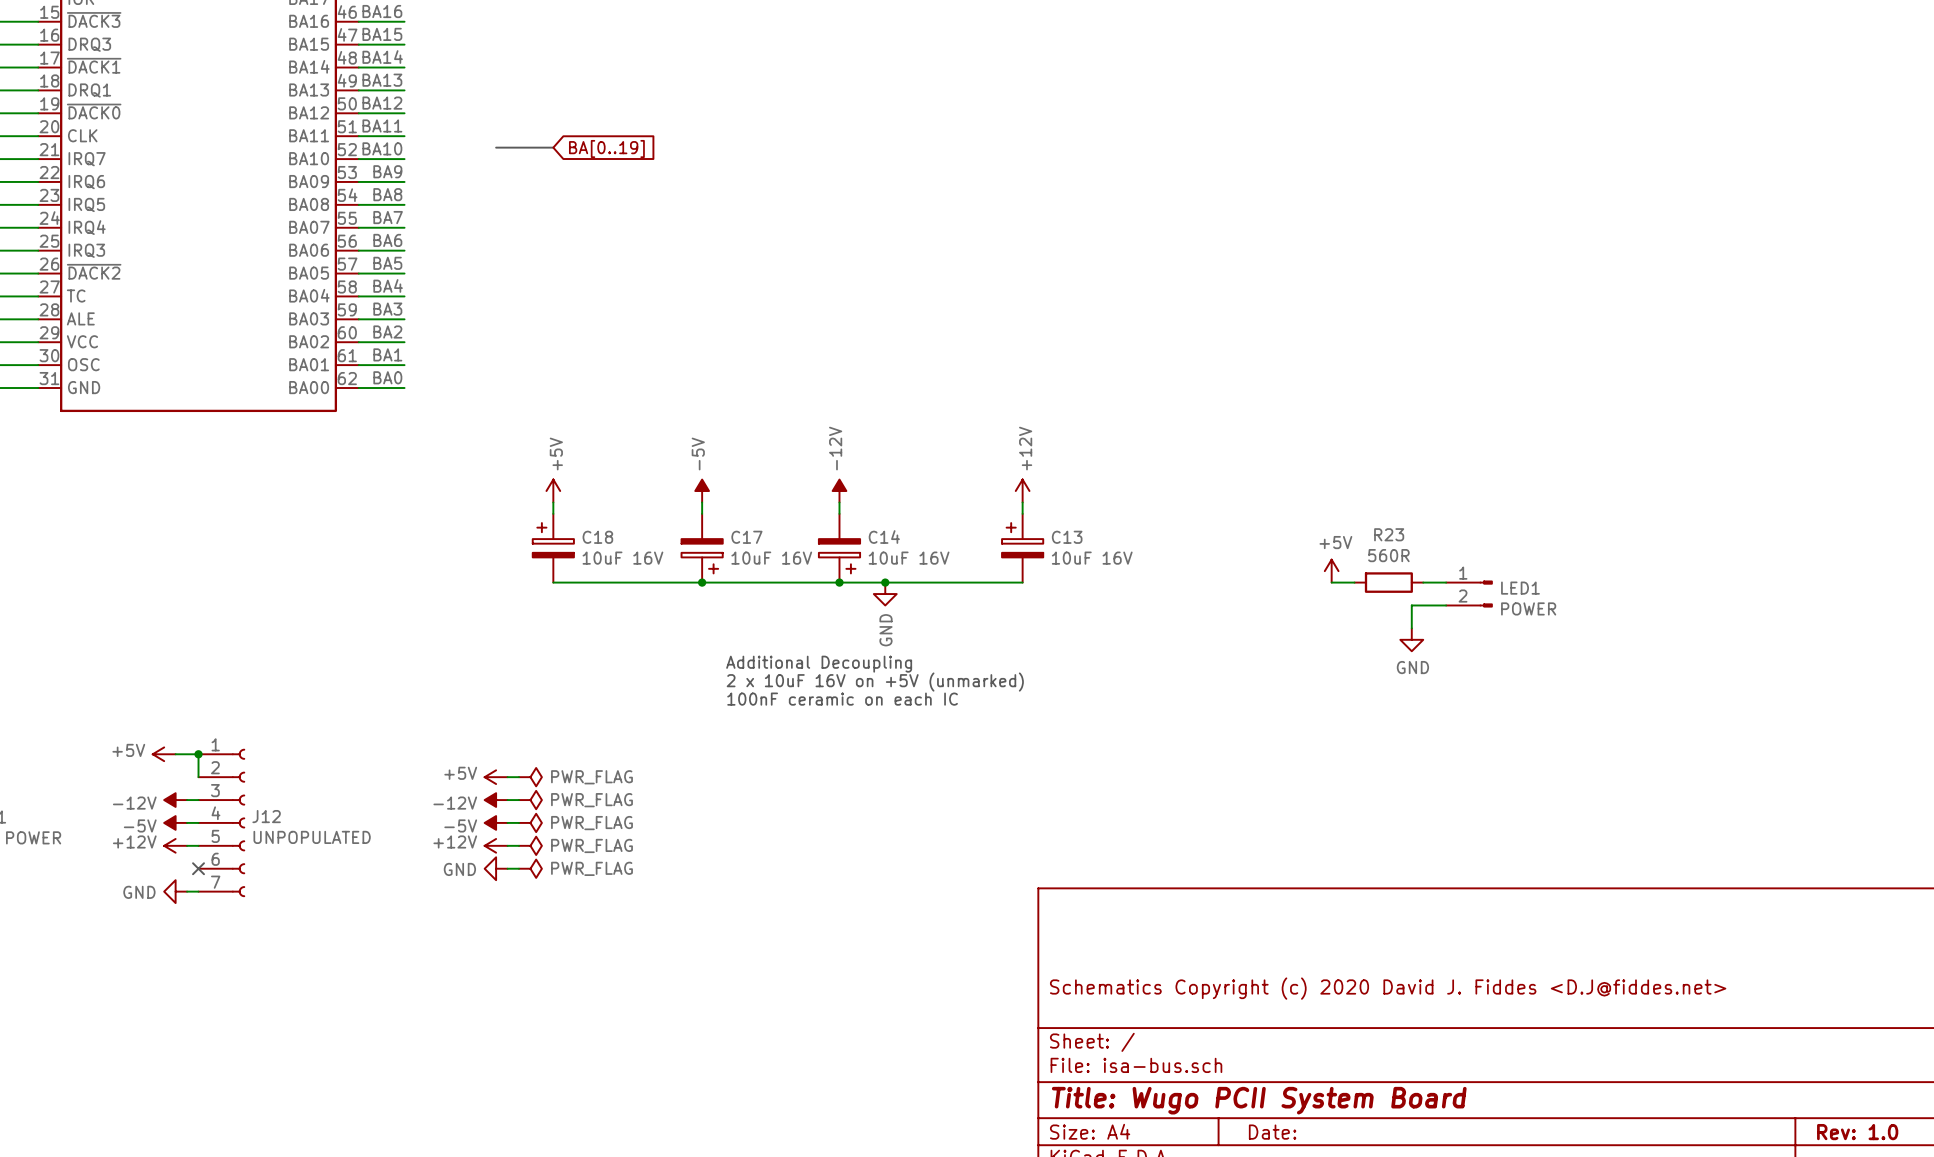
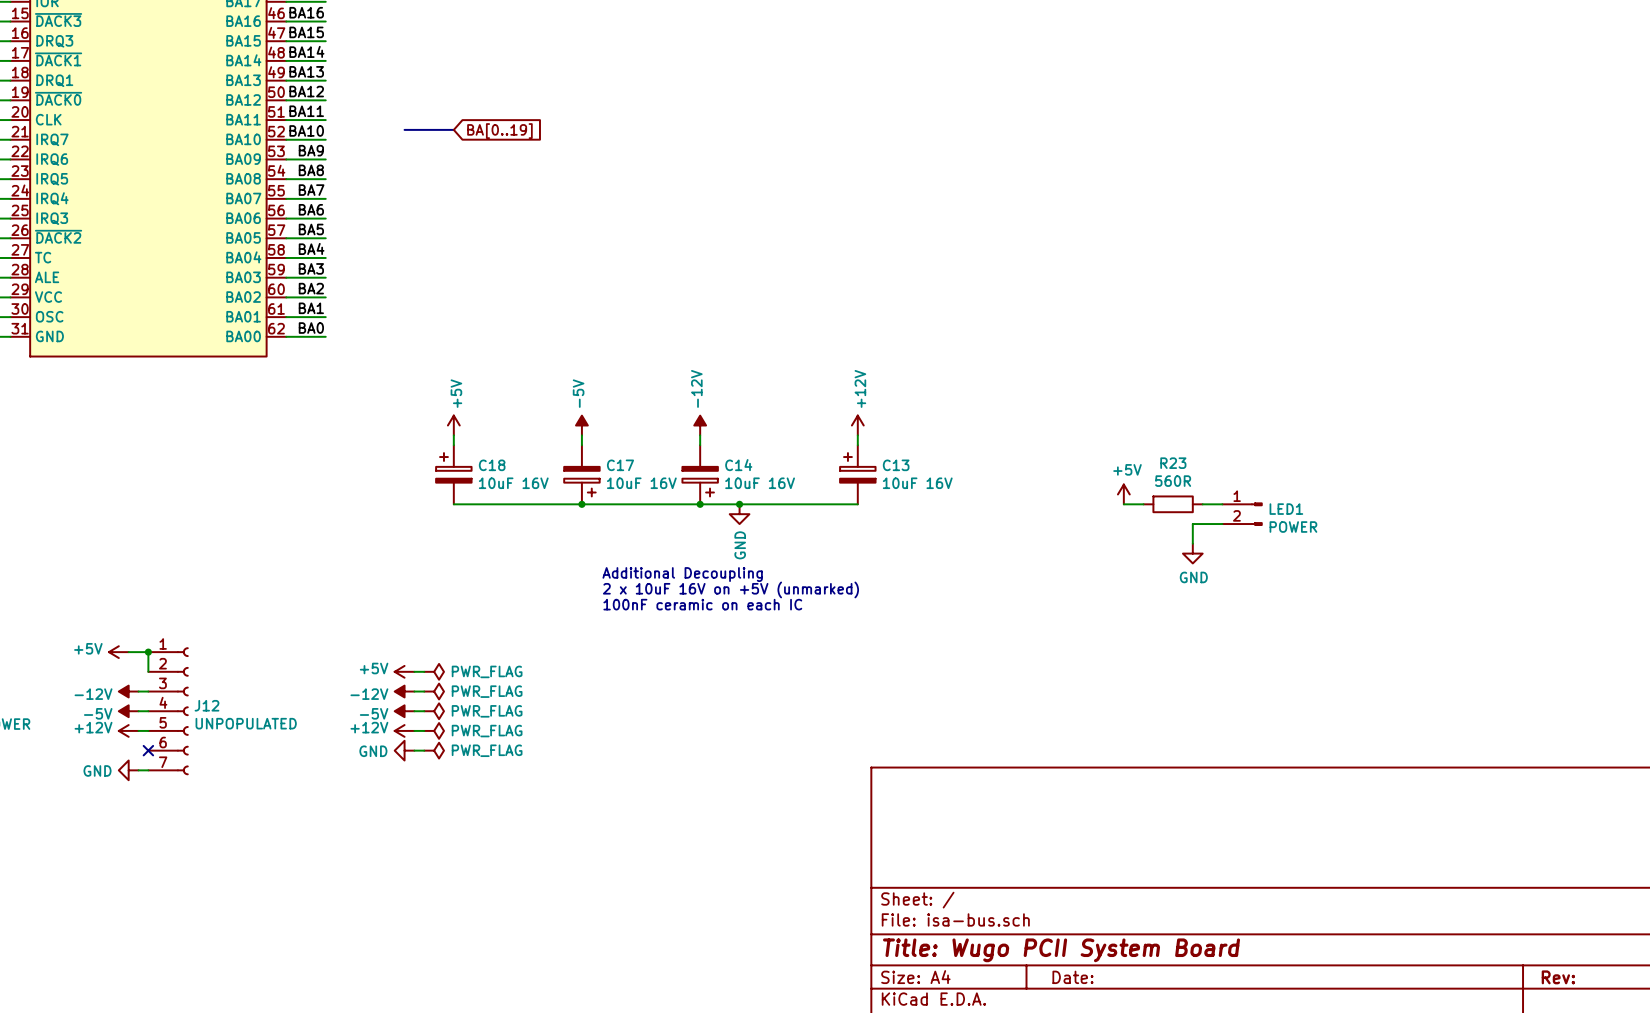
title block: Schematics Copyright (c) 2020 David J. Fiddes <D.J@fiddes.net> (1388, 988) -> none
title block: Rev: 1.0 (1857, 1132) -> Rev: (1558, 977)

